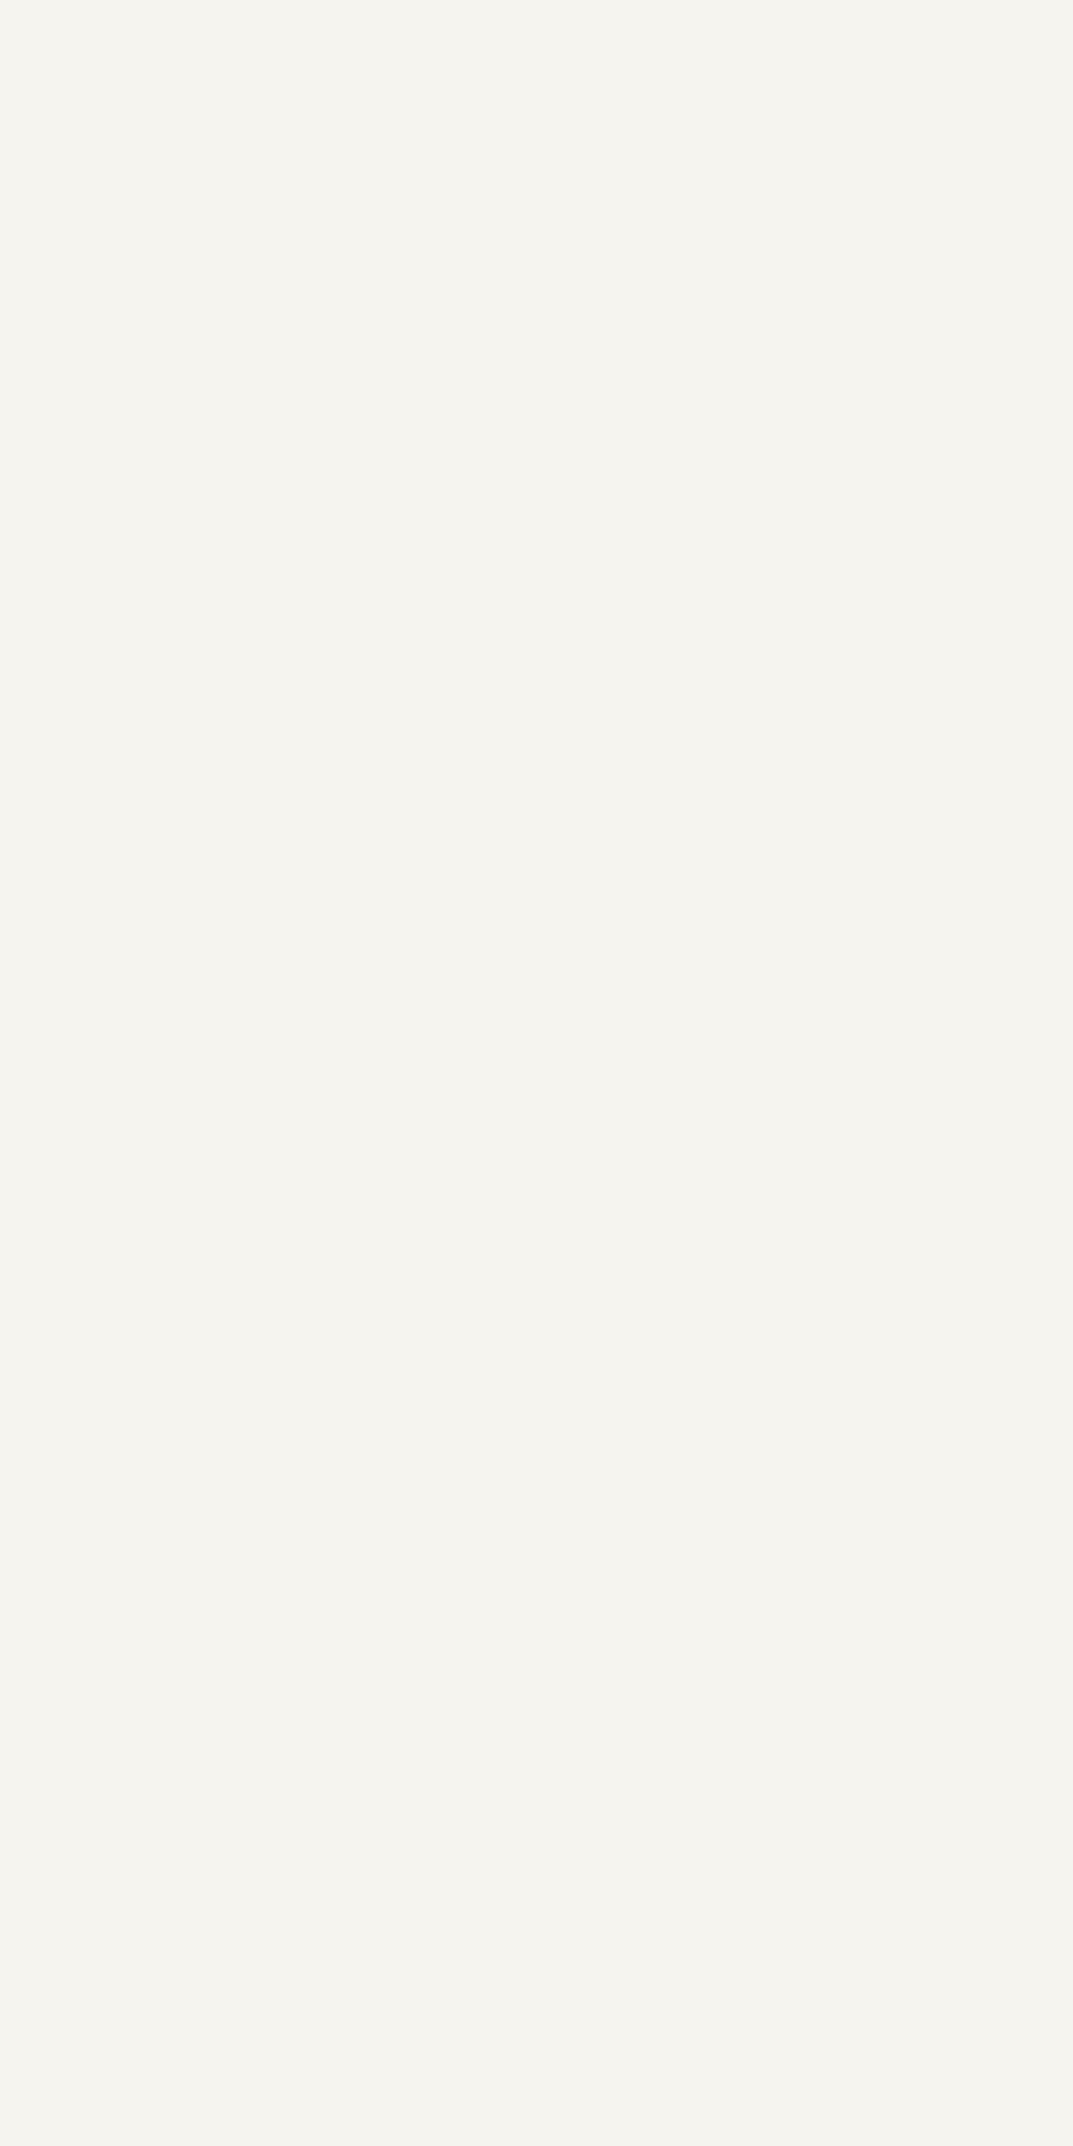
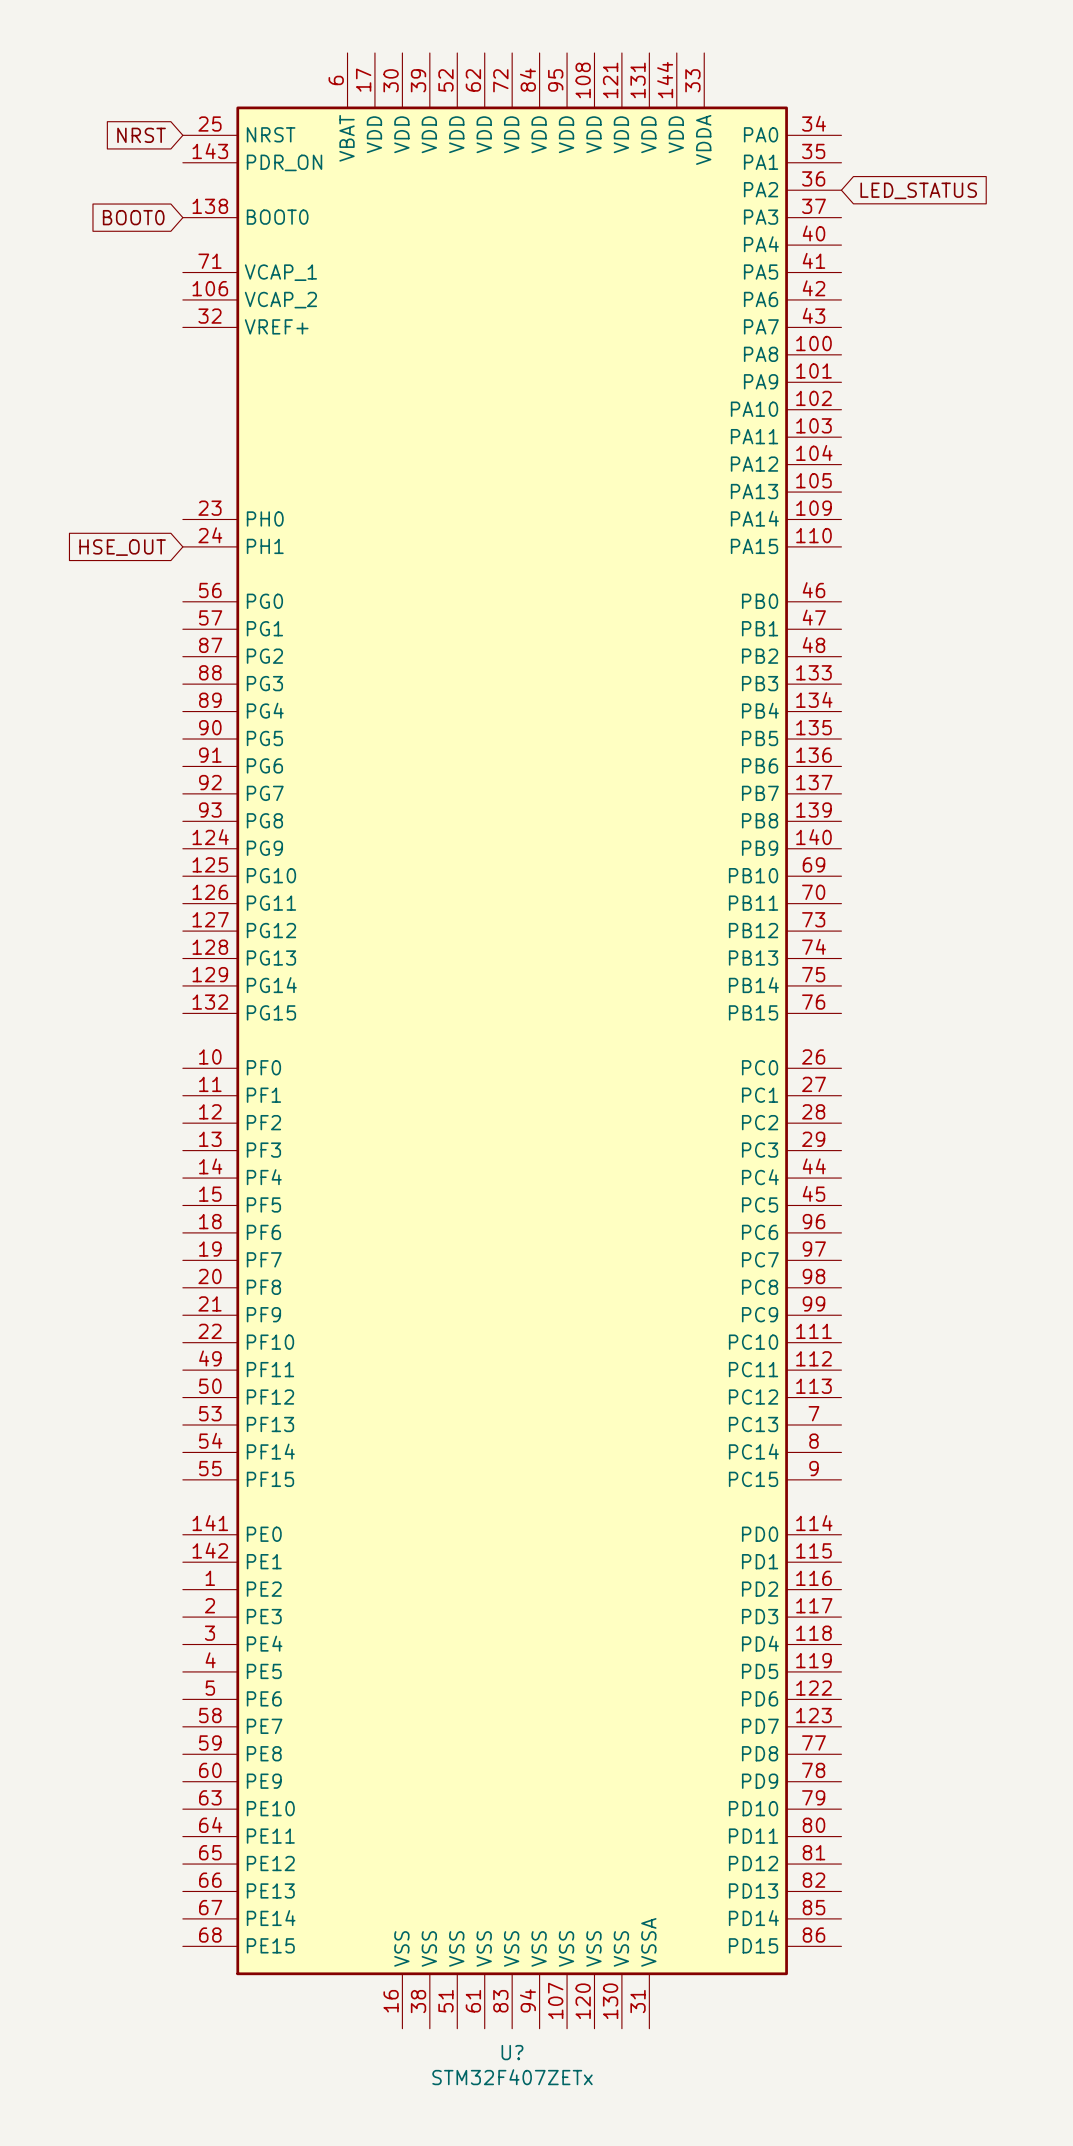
global label: none -> NRST (141, 135)
global label: none -> LED_STATUS (918, 190)
global label: none -> BOOT0 (133, 217)
global label: none -> HSE_OUT (122, 547)
U?: none -> STM32F407ZETx (512, 1040)

